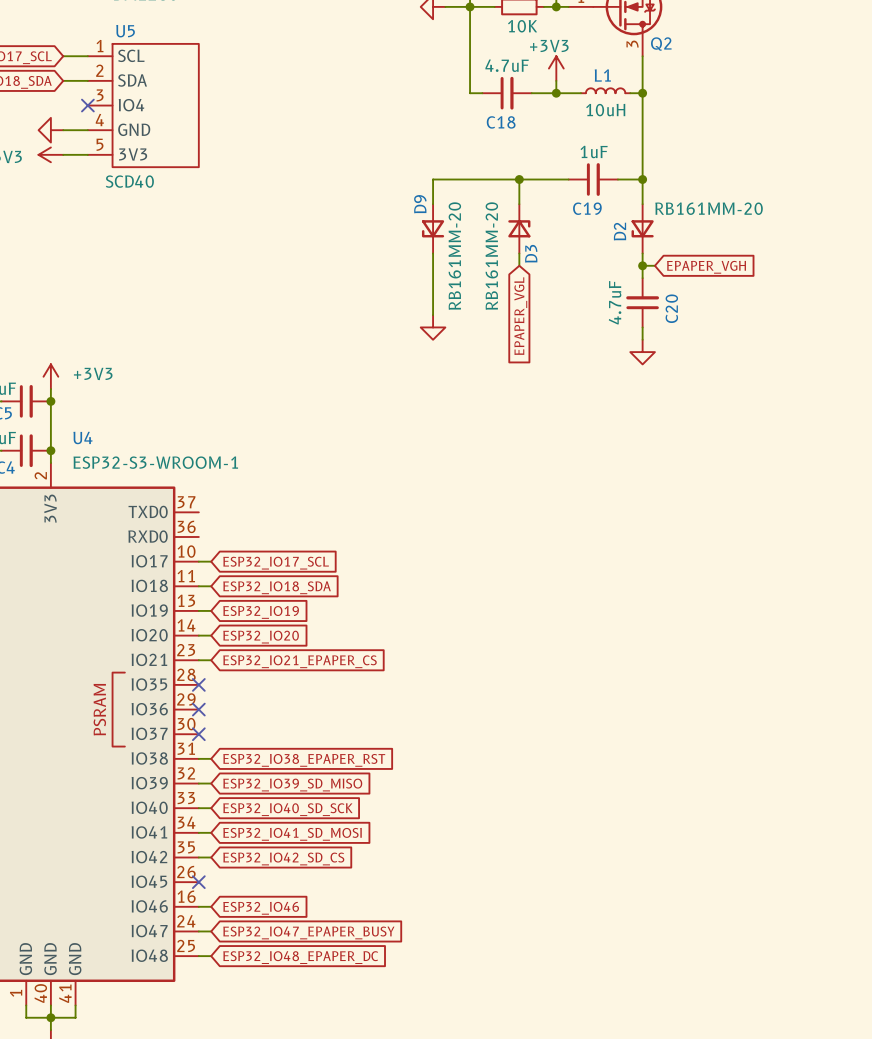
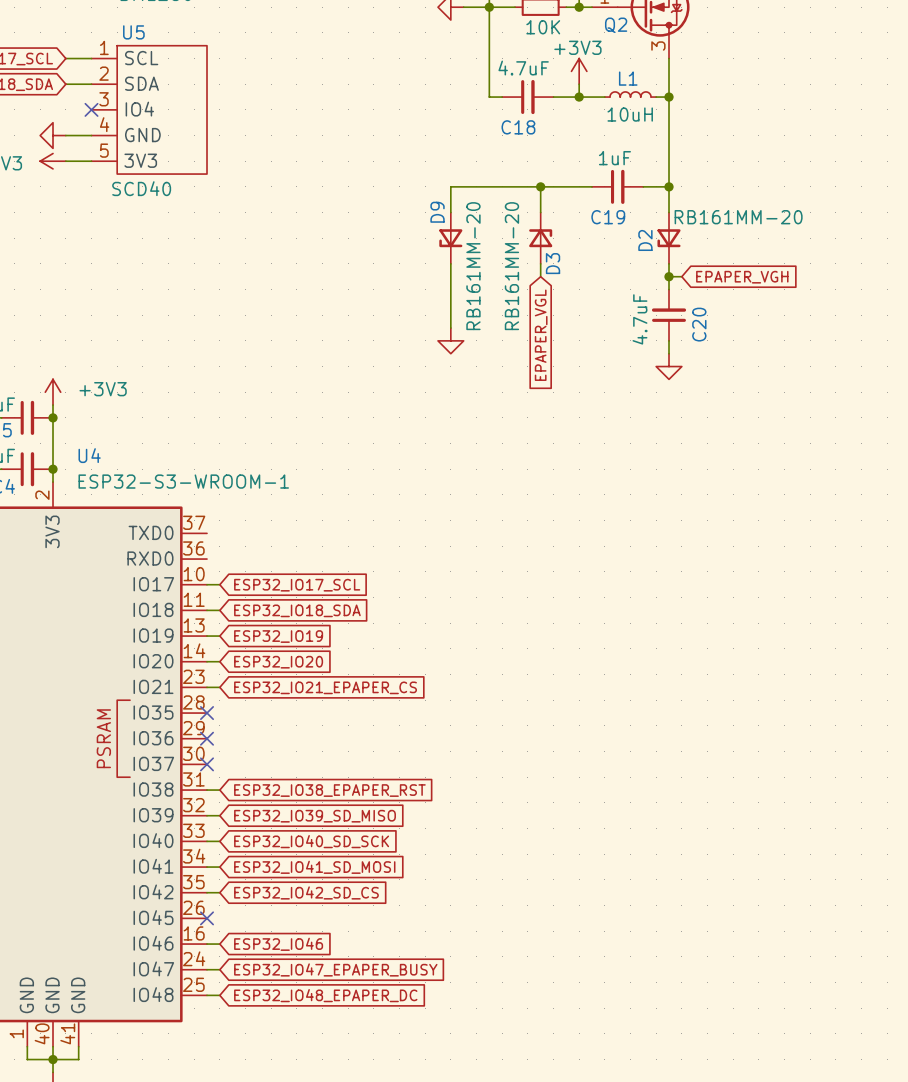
Q2 name position: Q2 (661, 44) -> Q2 (616, 25)

